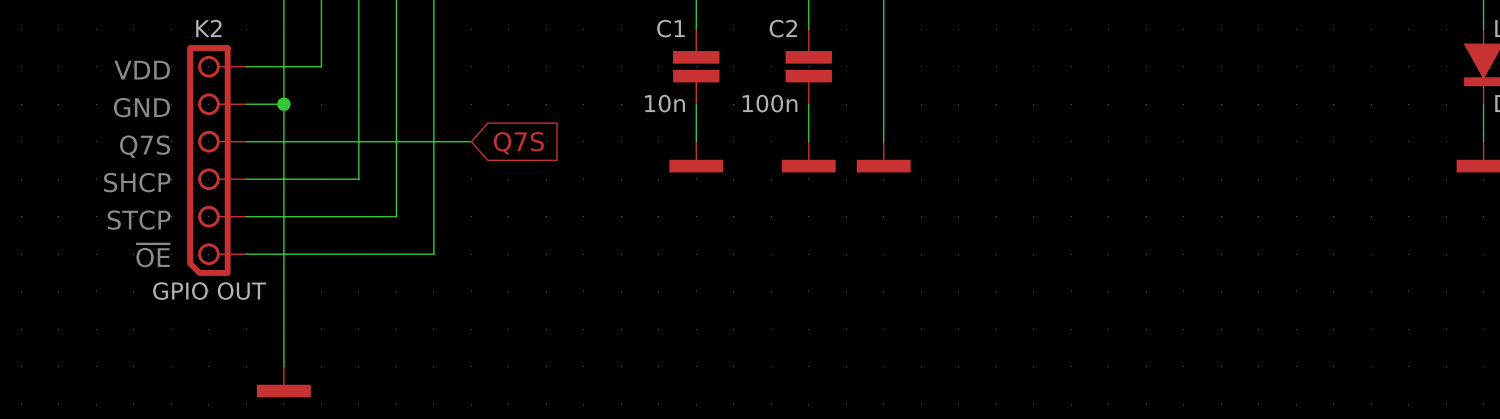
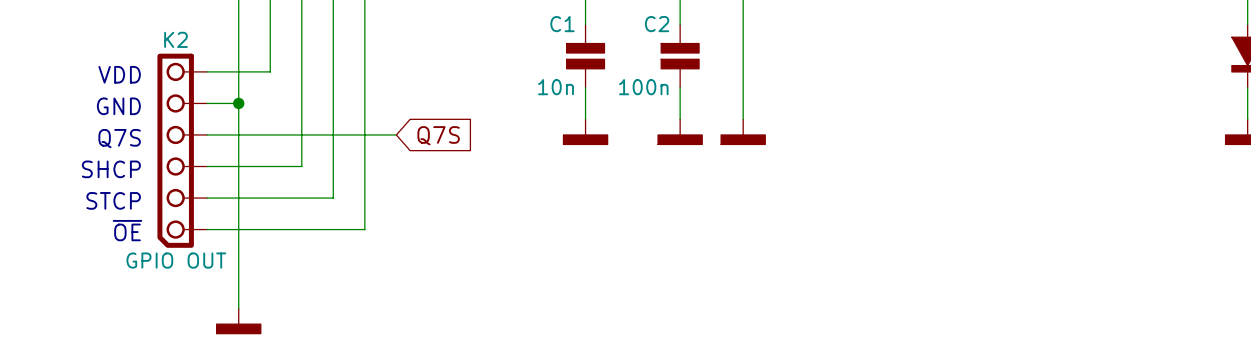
wire: (246, 66) (321, 66) -> (207, 71) (270, 71) (270, 56)
text position: VDD (142, 70) -> VDD (119, 74)
wire: (246, 104) (283, 104) -> (207, 103) (238, 103)
junction position: (283, 104) -> (238, 103)
text position: GND (141, 107) -> GND (118, 106)
wire: (246, 141) (471, 141) -> (207, 134) (396, 134)
global label position: Q7S (518, 143) -> Q7S (438, 135)
text position: Q7S (144, 146) -> Q7S (119, 138)
K2 position: (216, 160) -> (182, 150)
wire: (246, 179) (358, 179) -> (207, 166) (301, 166) (301, 150)
text position: SHCP (137, 182) -> SHCP (111, 169)
wire: (246, 216) (396, 216) -> (207, 198) (333, 198) (333, 182)
text position: STCP (139, 220) -> STCP (113, 200)
wire: (246, 254) (433, 254) -> (207, 229) (364, 229) (364, 213)
text position: ~{OE} (153, 255) -> ~{OE} (127, 230)

